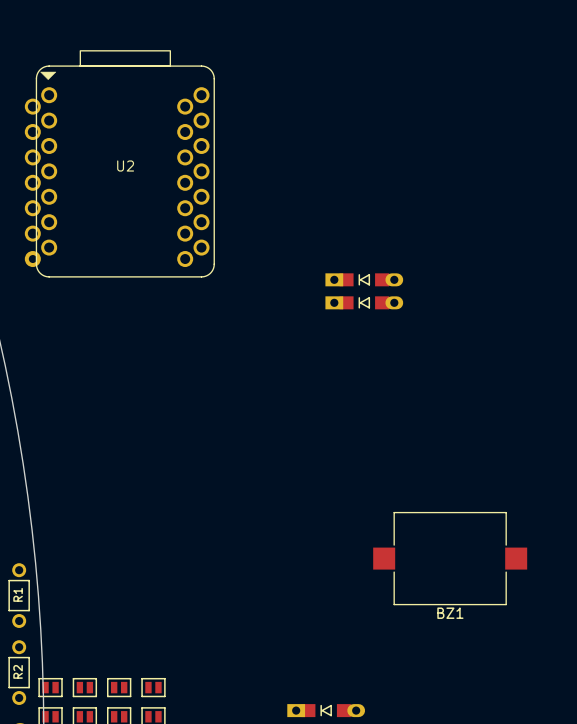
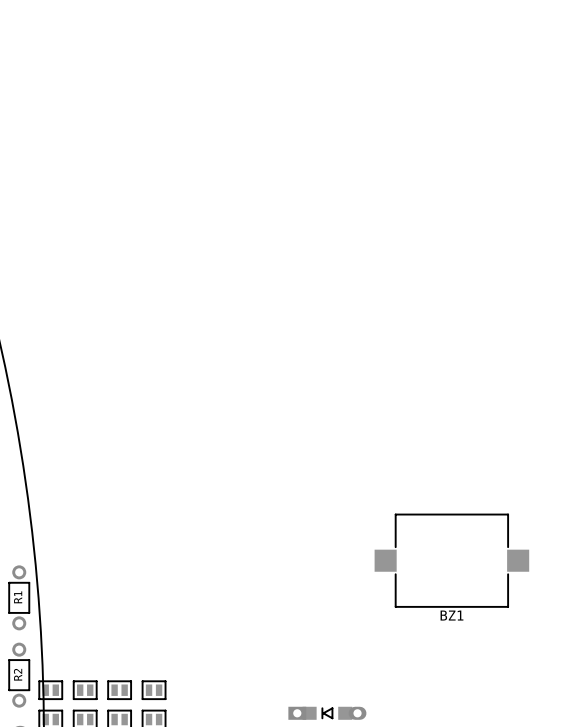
U2: (119, 163) -> none
part: (364, 279) -> none
part: (364, 302) -> none

